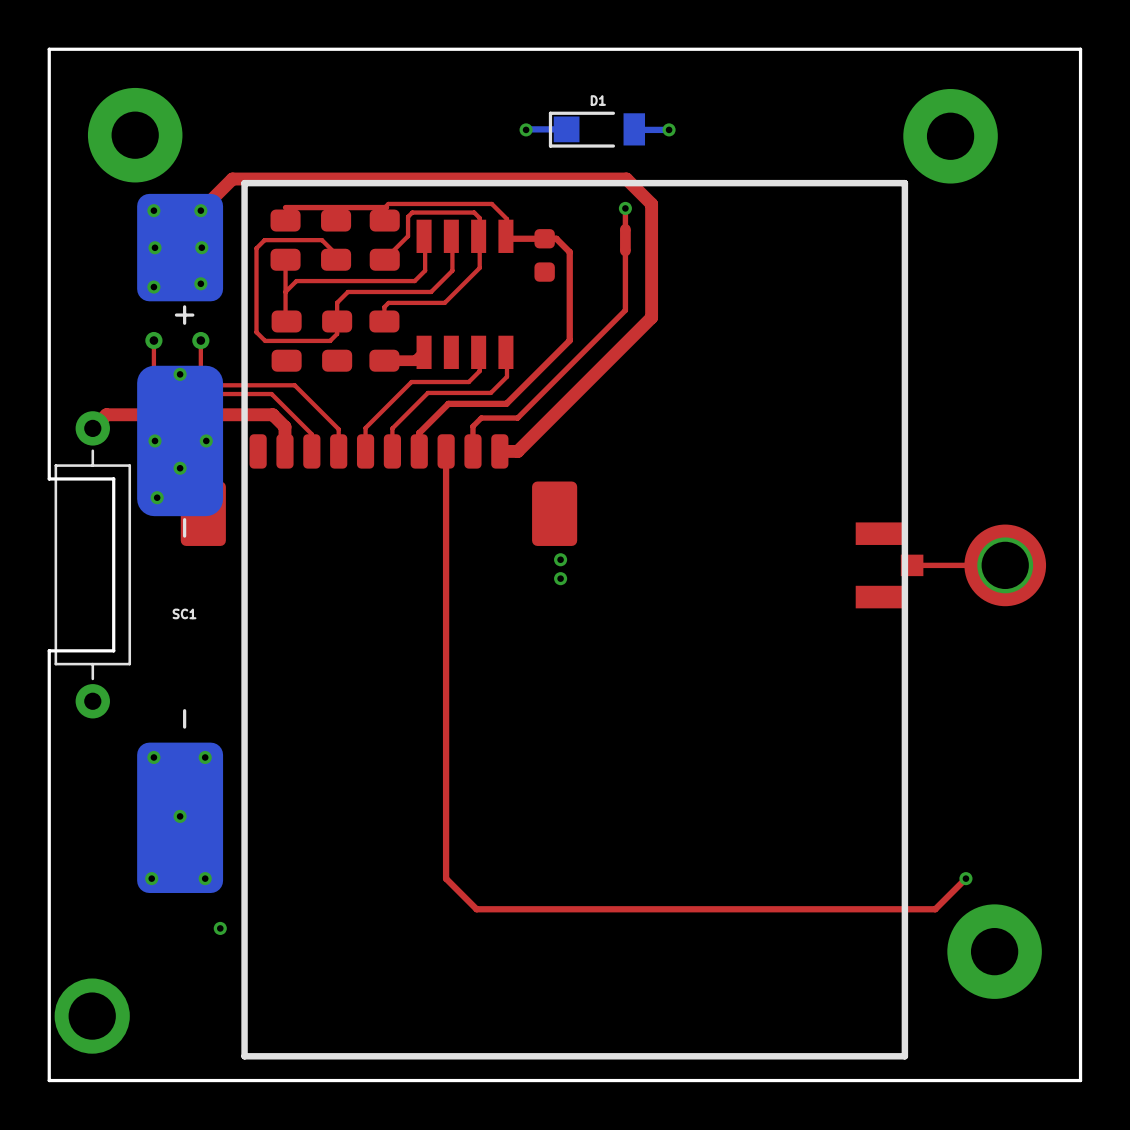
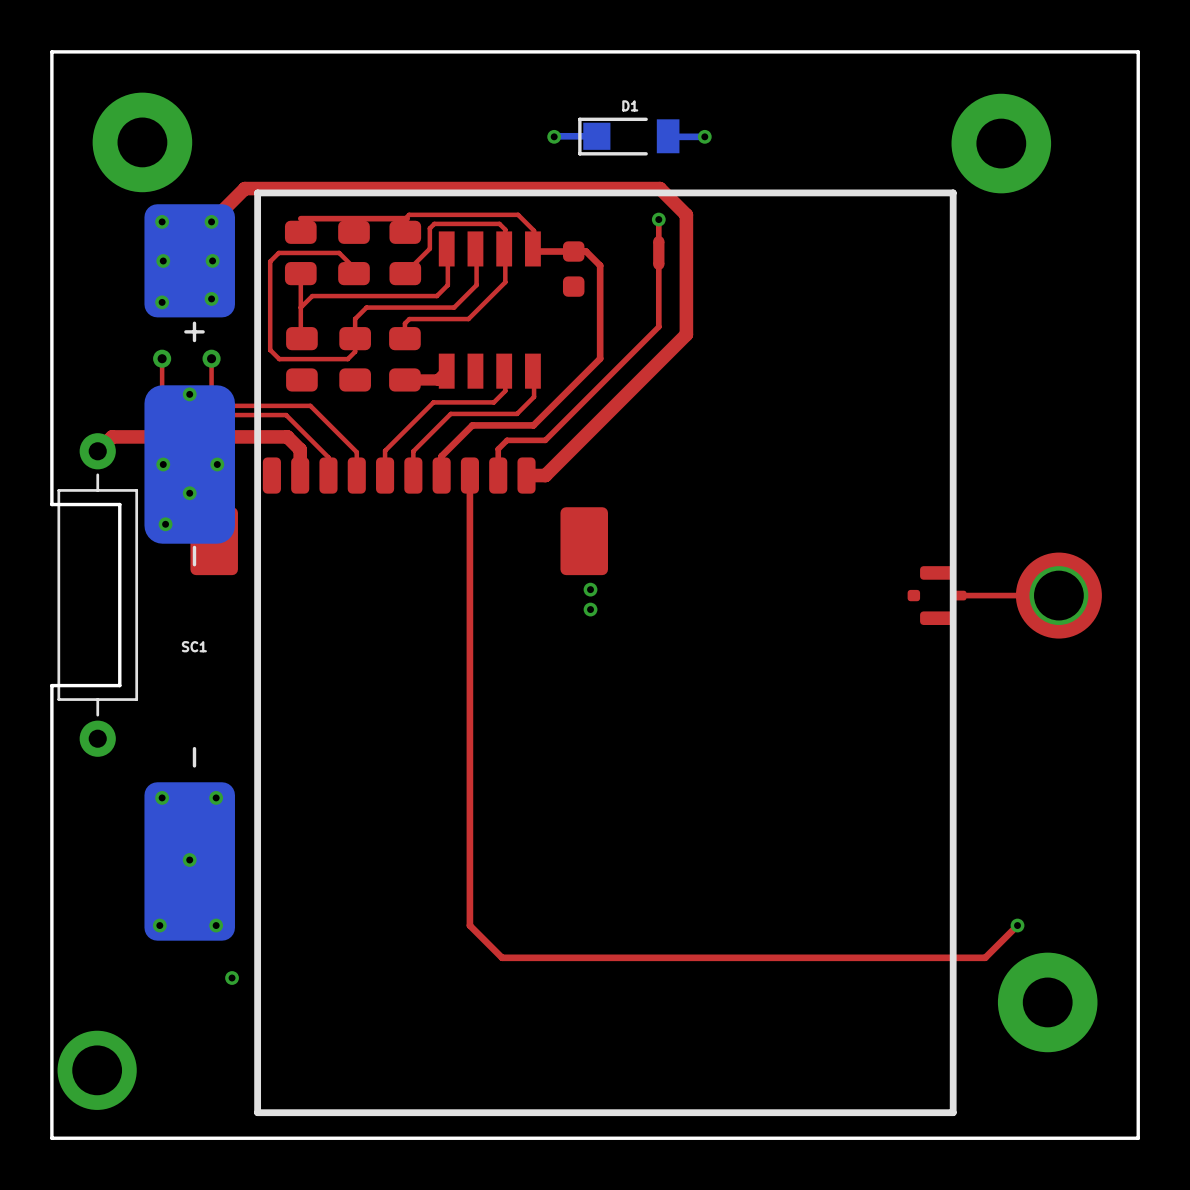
part footprint: [855, 522, 924, 609] -> [907, 566, 967, 625]

